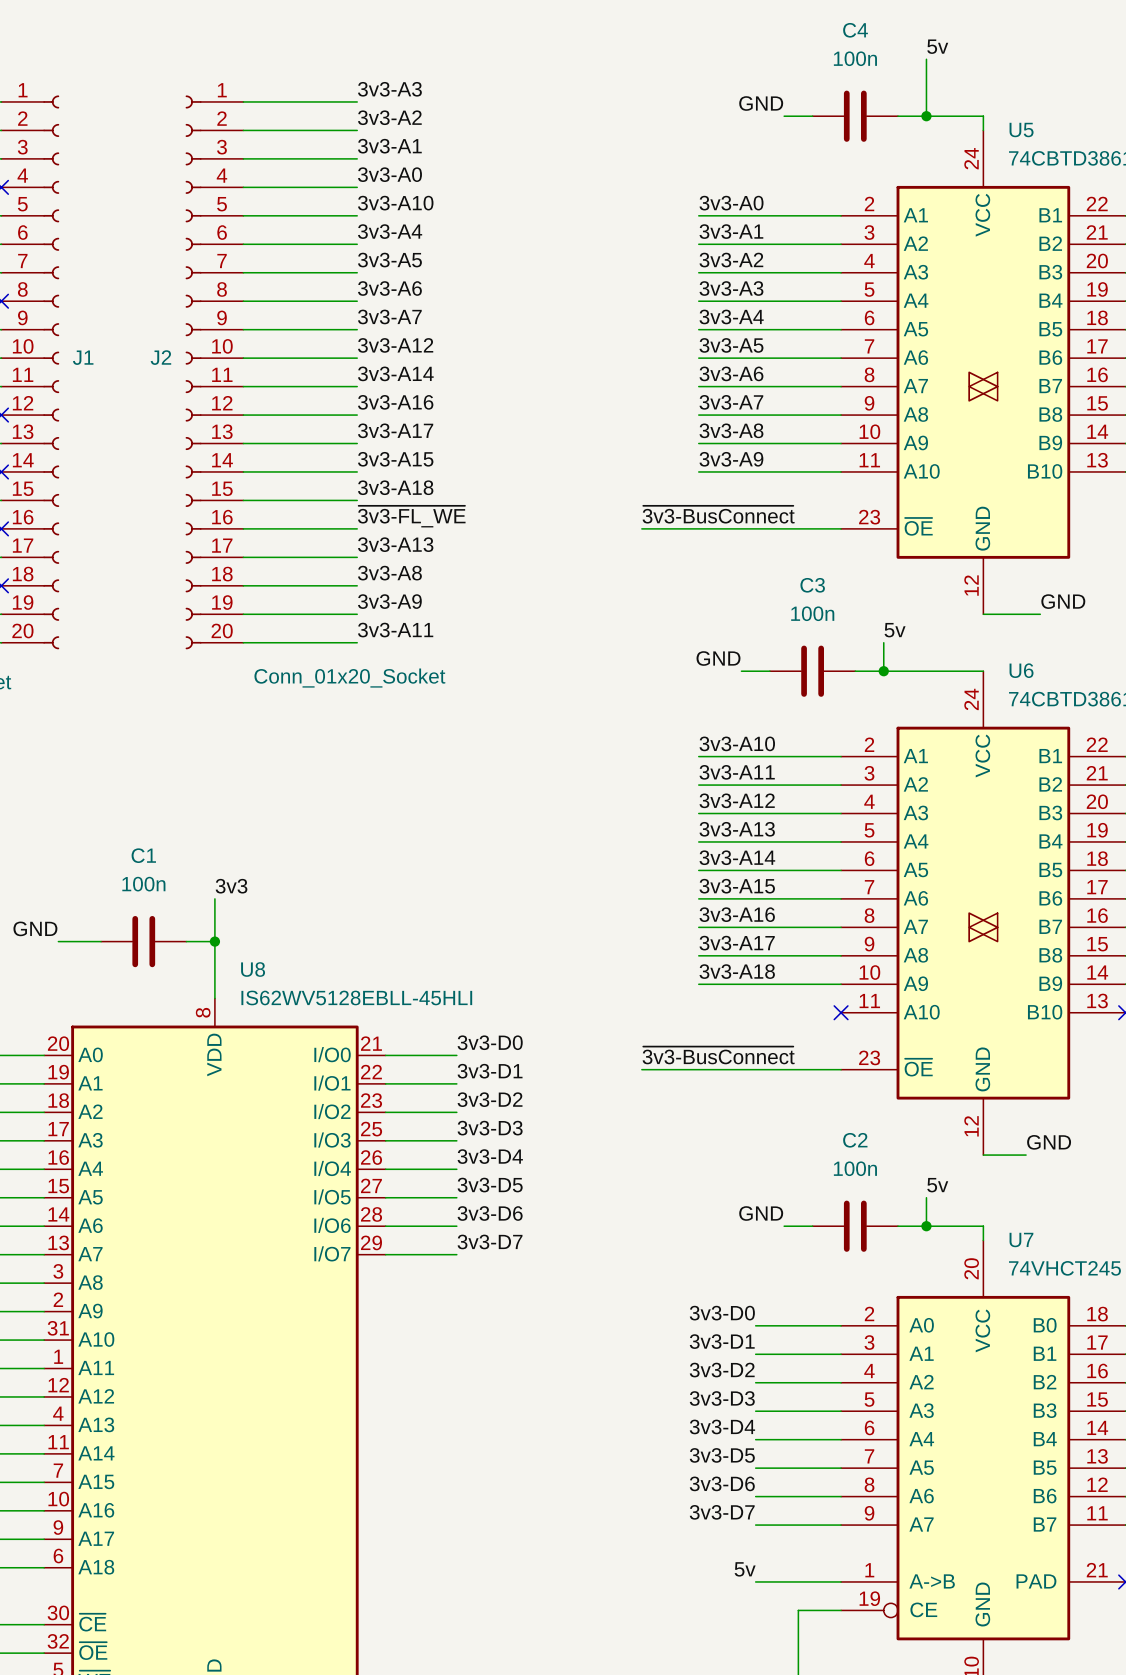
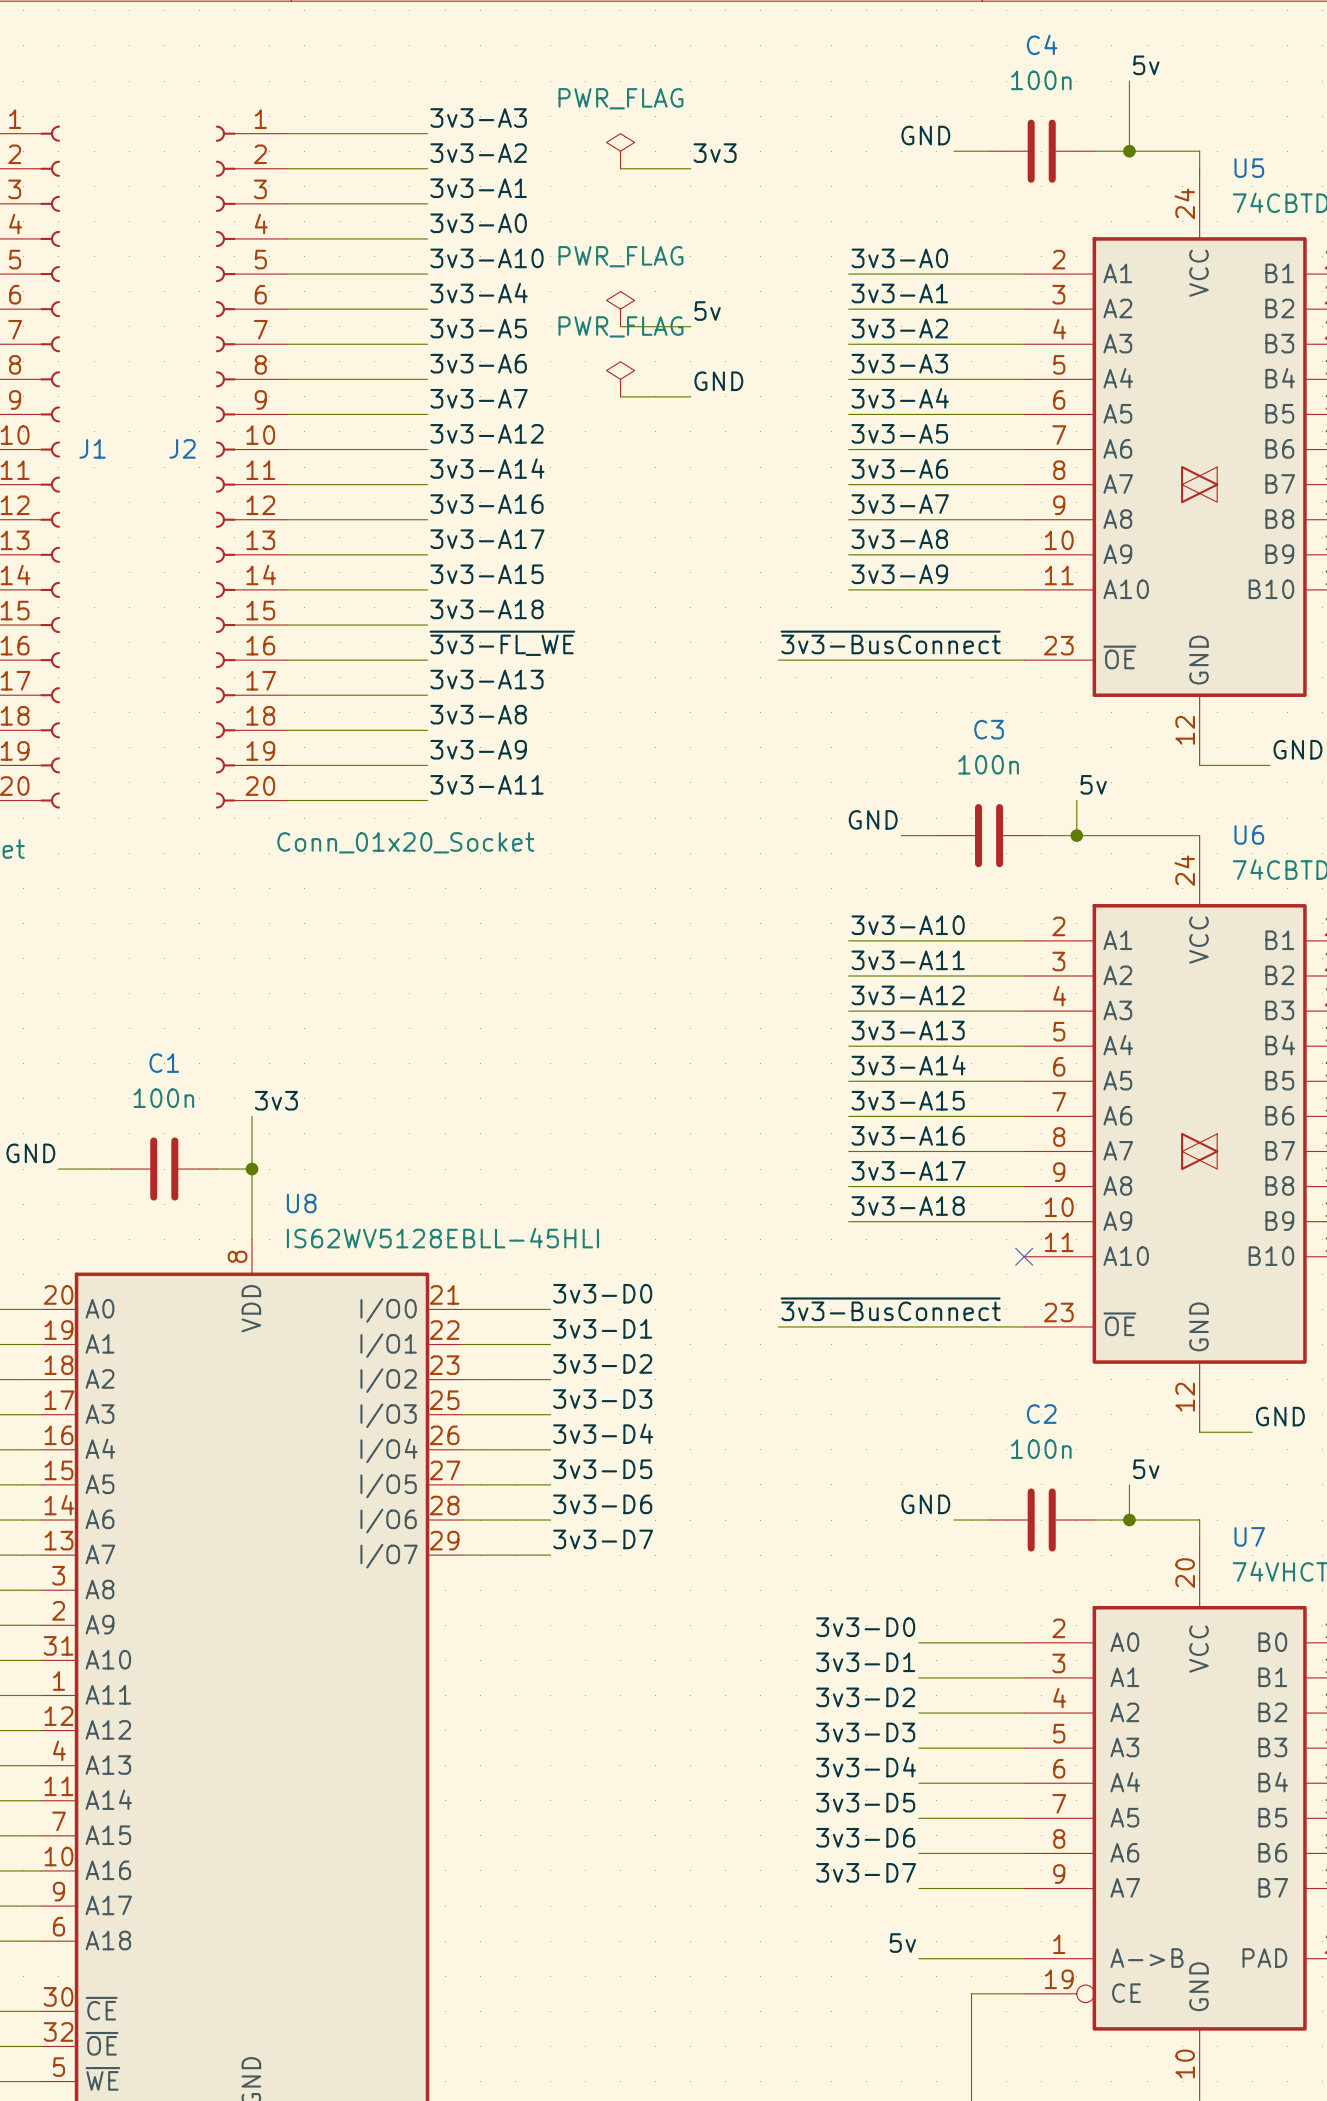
power symbol: none -> PWR_FLAG (620, 151)
label: none -> 3v3 (715, 153)
wire: none -> (620, 168) (690, 168)
power symbol: none -> PWR_FLAG (620, 309)
label: none -> 5v (707, 311)
wire: none -> (620, 326) (690, 326)
power symbol: none -> PWR_FLAG (620, 379)
label: none -> GND (718, 381)
wire: none -> (620, 396) (690, 396)

